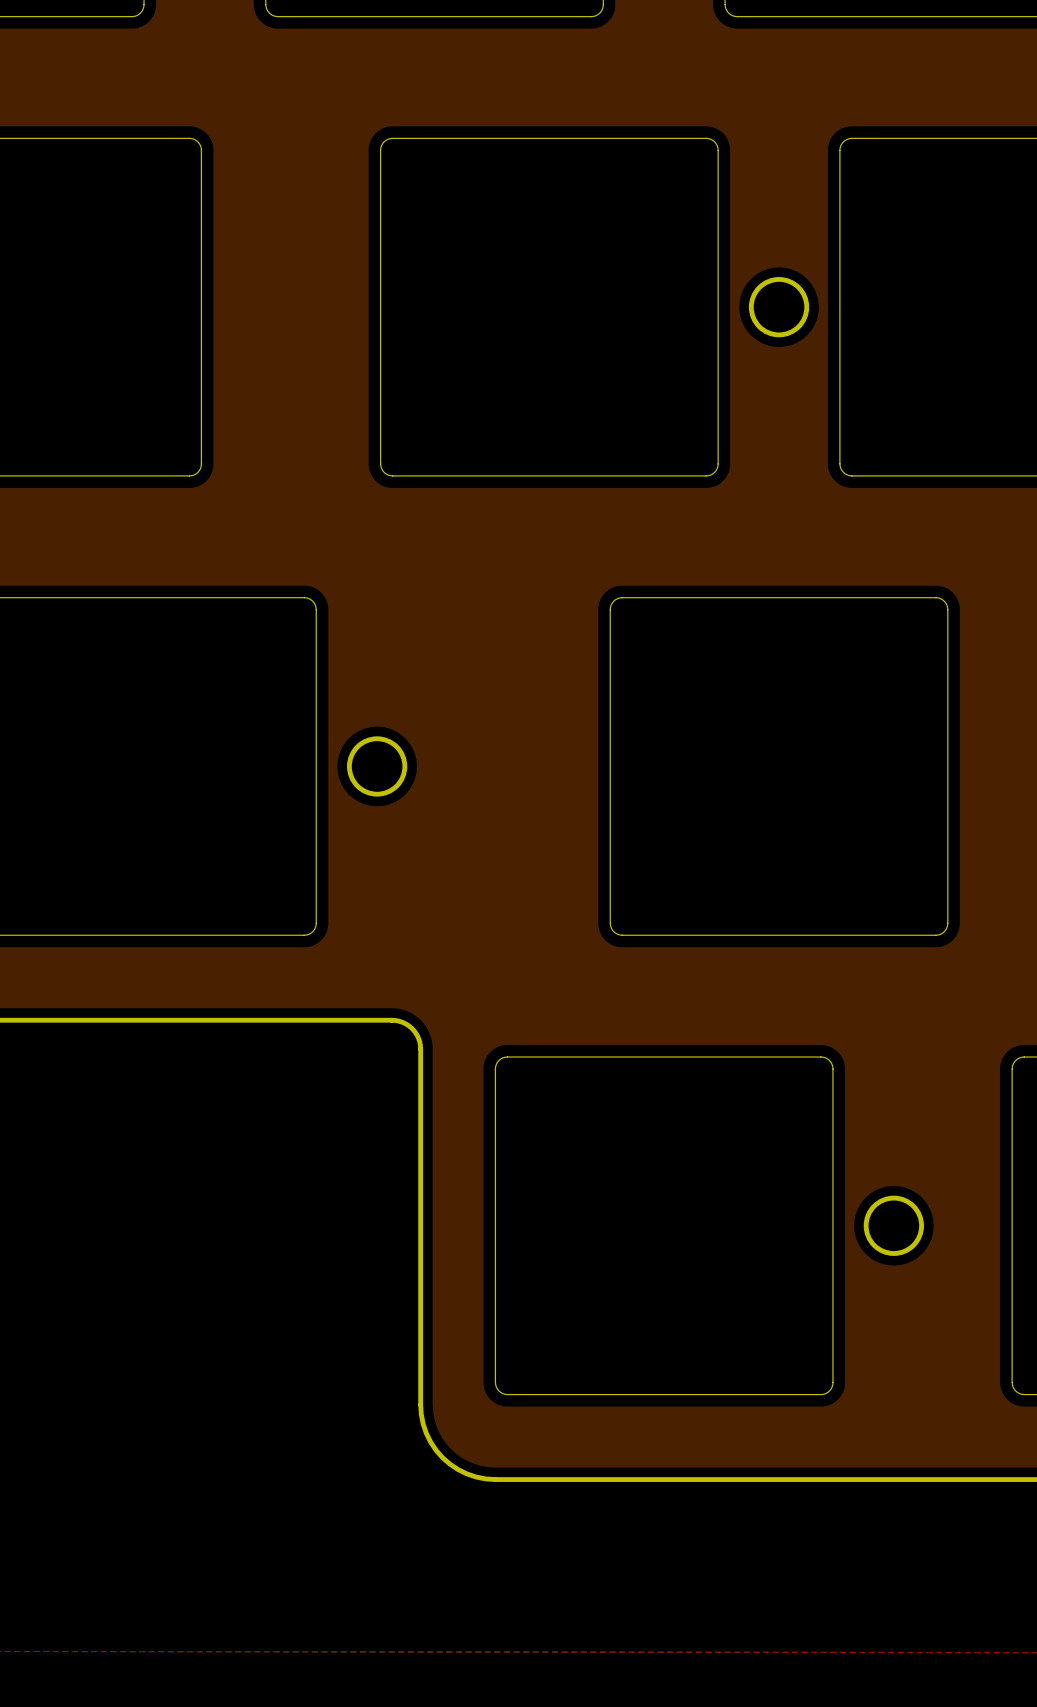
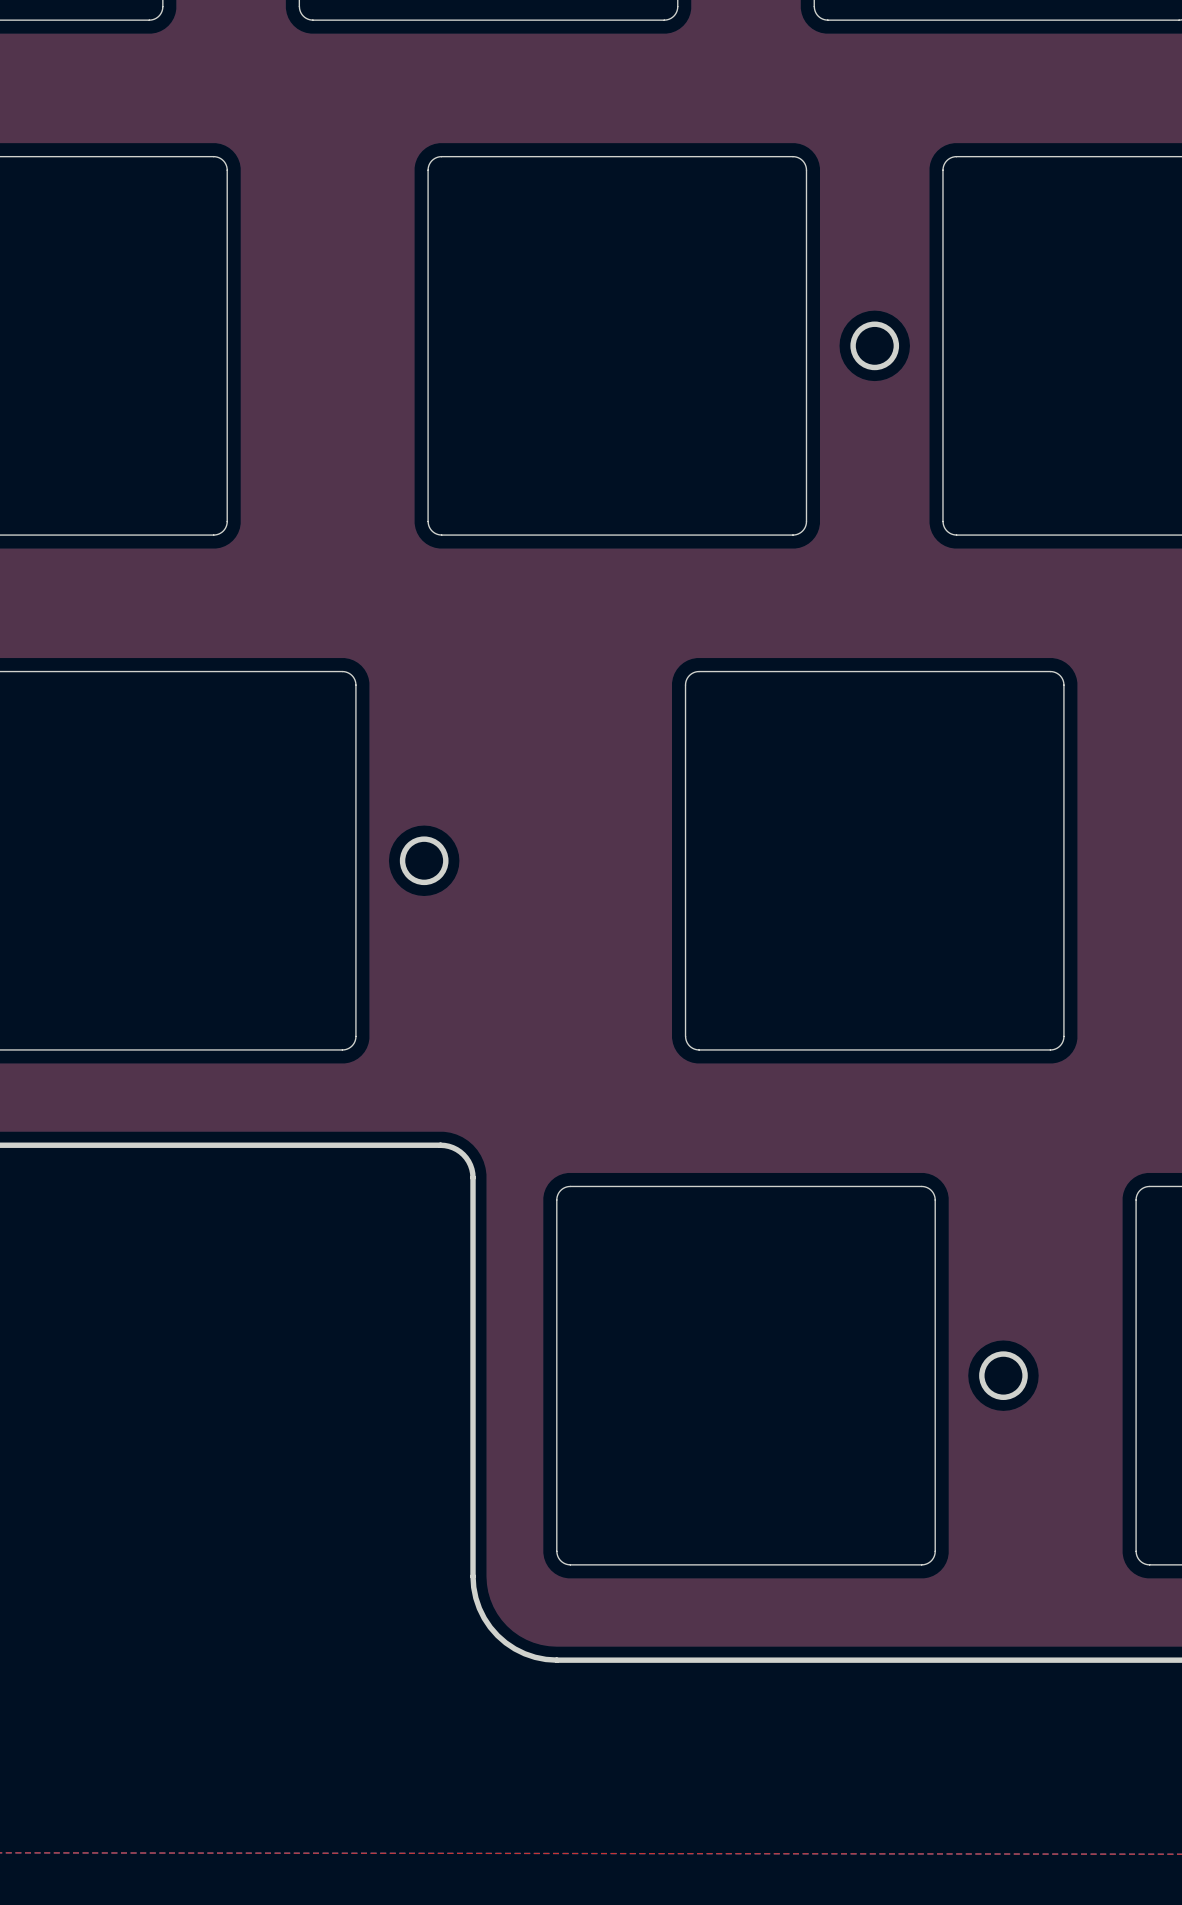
round board edge size: [748, 277, 810, 338] -> [850, 321, 900, 371]
round board edge size: [346, 736, 408, 797] -> [399, 836, 449, 886]
round board edge size: [863, 1195, 924, 1256] -> [979, 1351, 1028, 1401]

